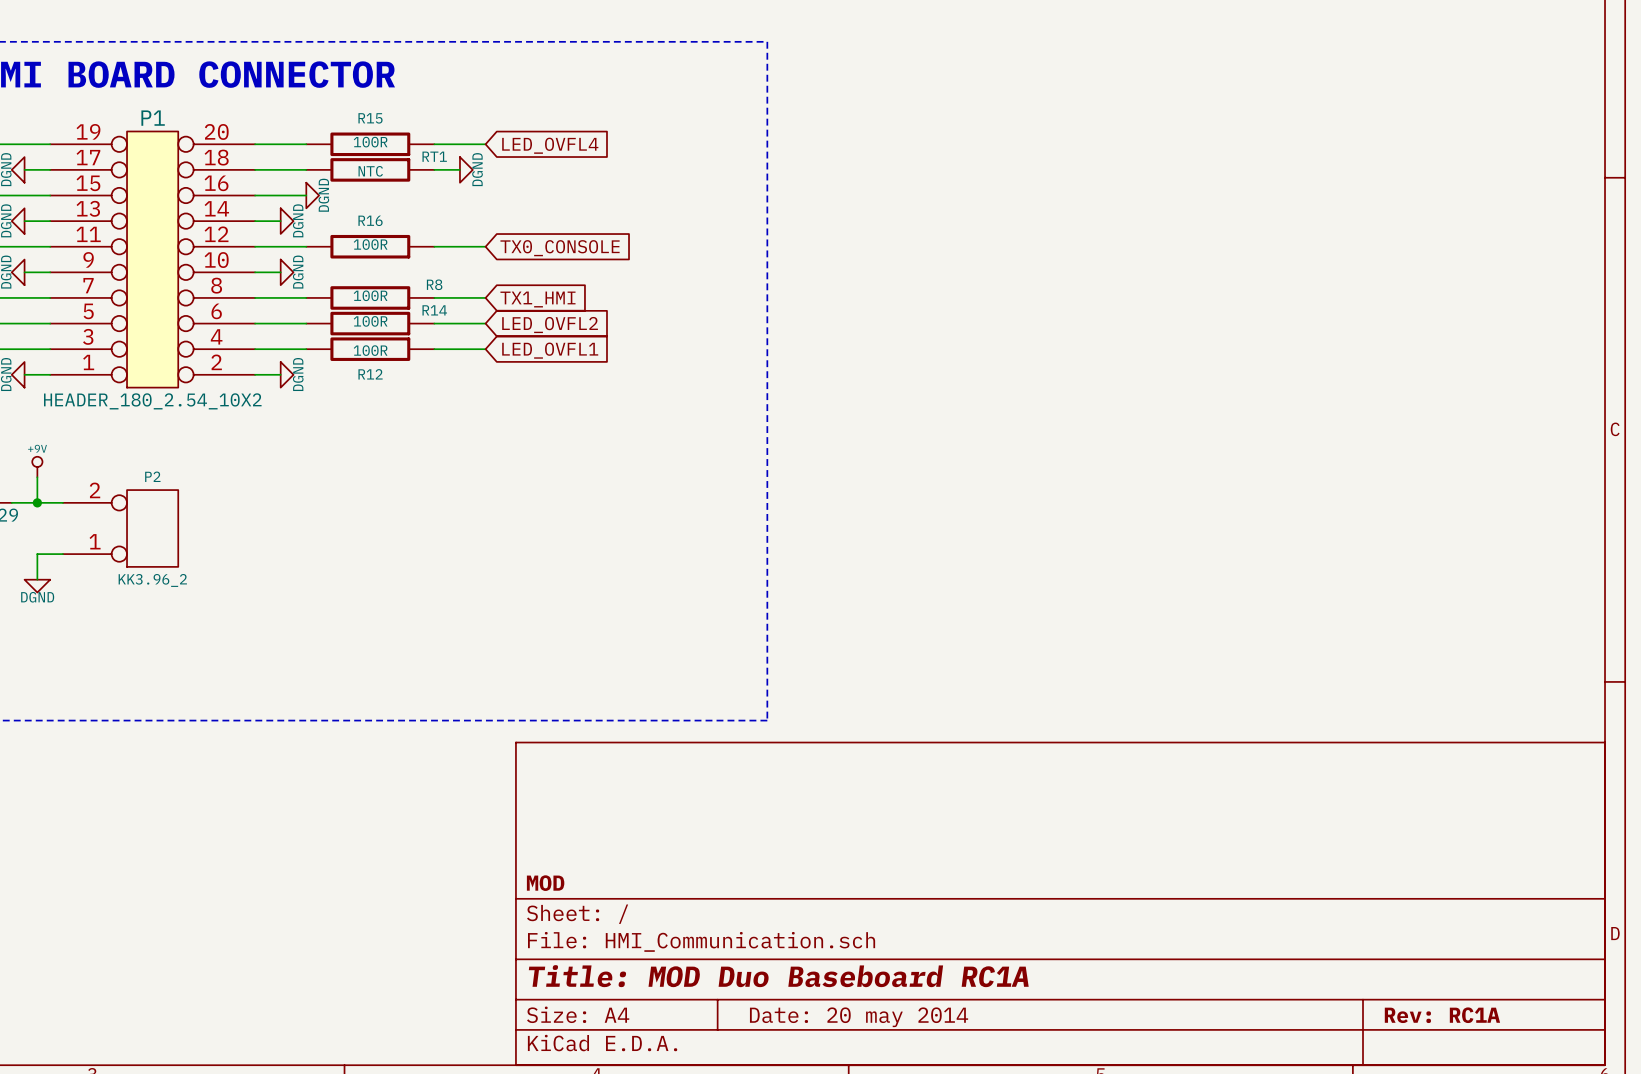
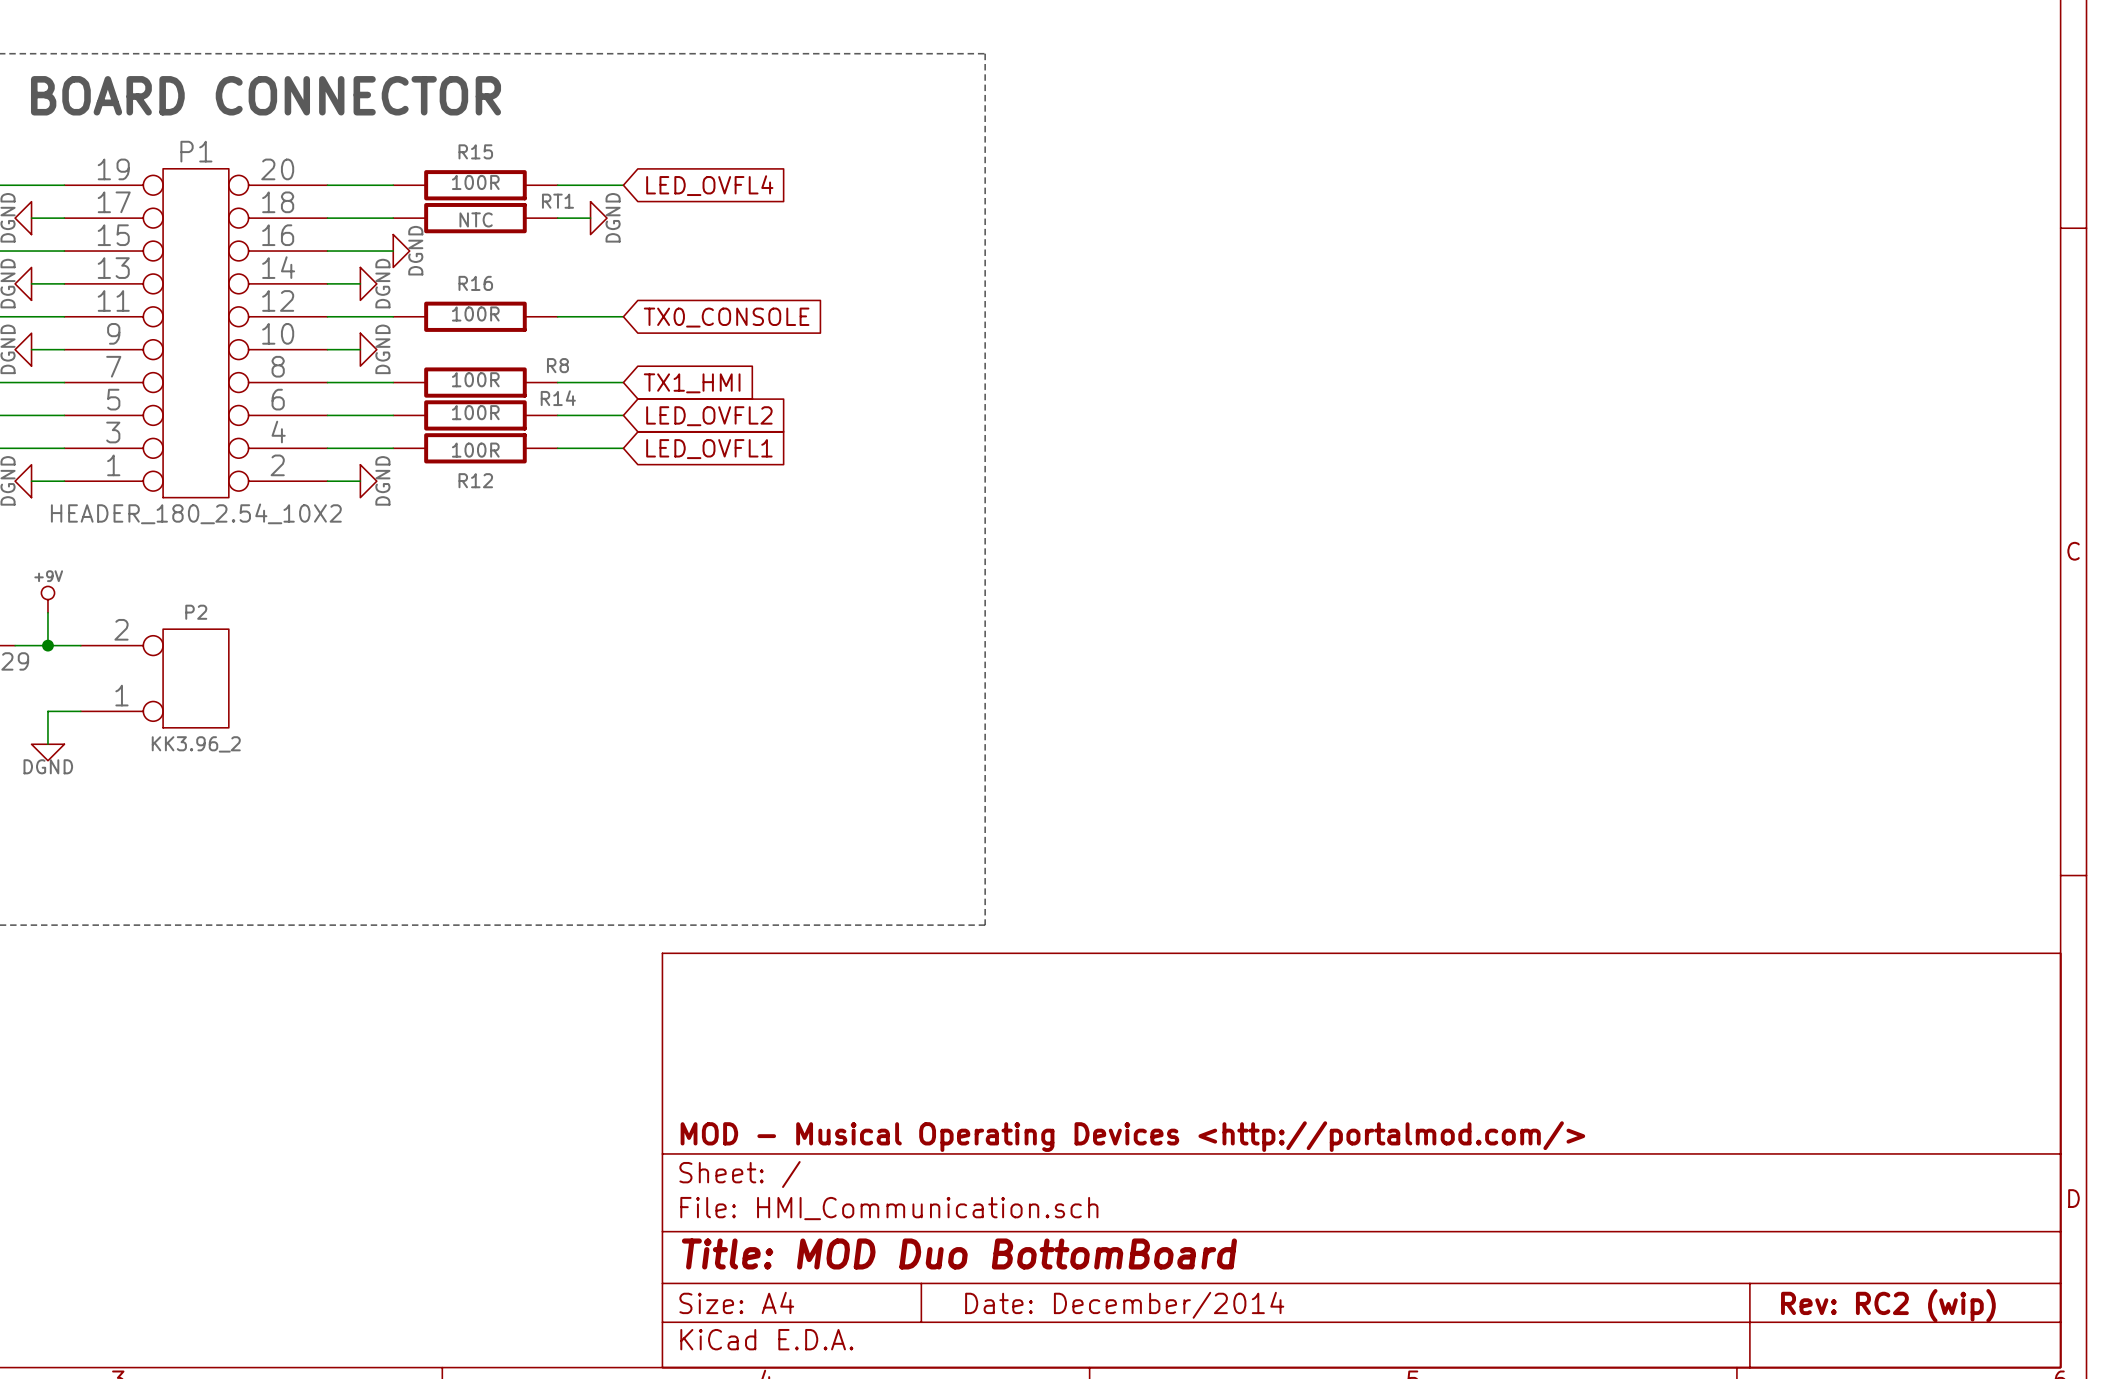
title block: MOD (545, 883) -> MOD - Musical Operating Devices <http://portalmod.com/> (1132, 1136)
title block: Title: MOD Duo Baseboard RC1A (778, 976) -> Title: MOD Duo BottomBoard (959, 1253)
title block: Rev: RC1A (1442, 1015) -> Rev: RC2 (wip) (1888, 1305)
title block: Date: 20 may 2014 (859, 1017) -> Date: December/2014 (1124, 1305)

